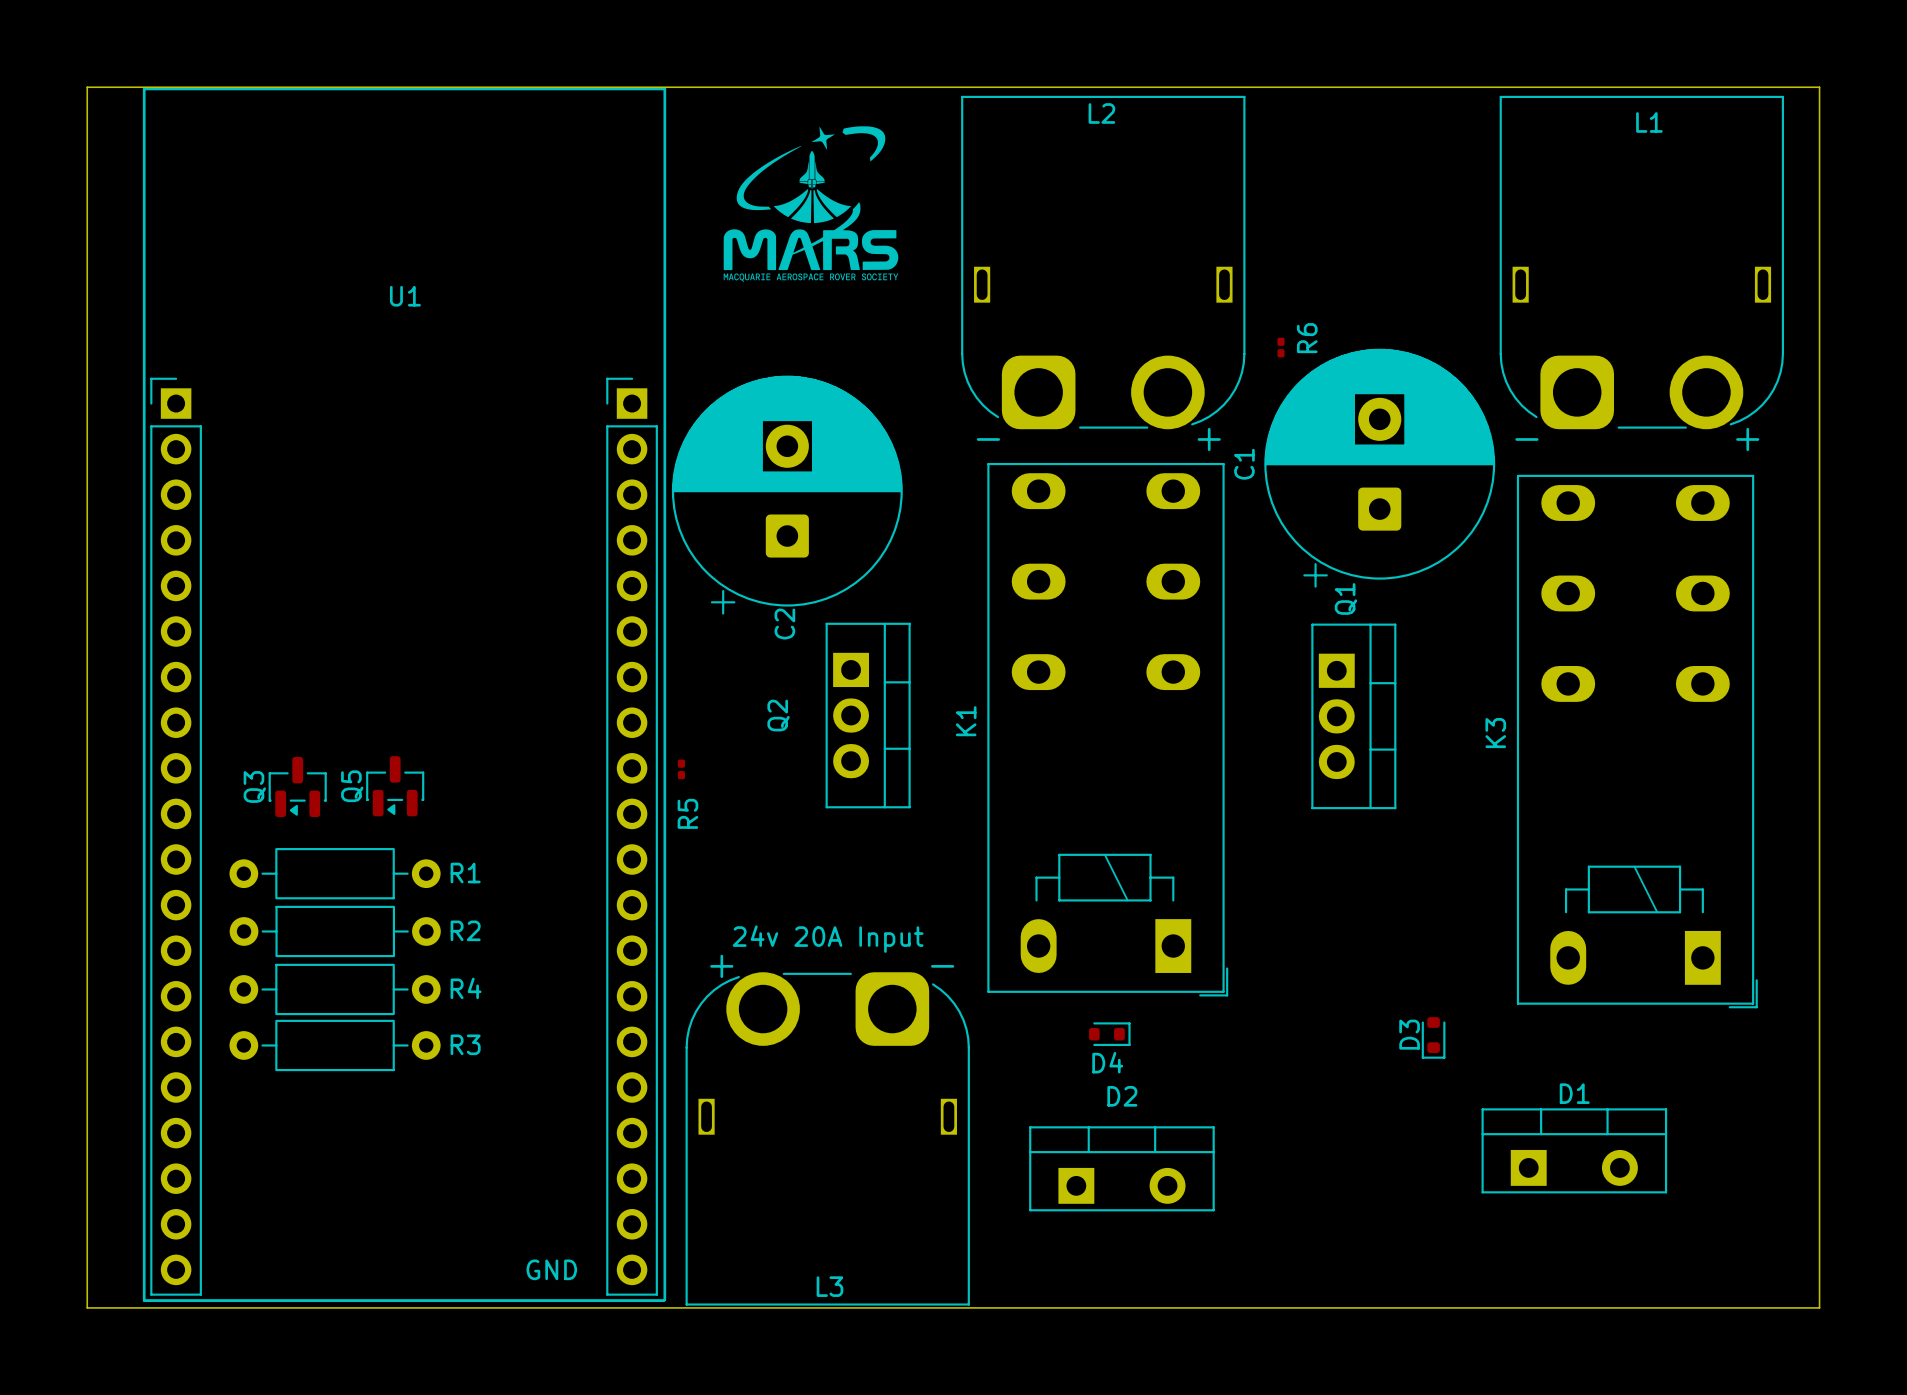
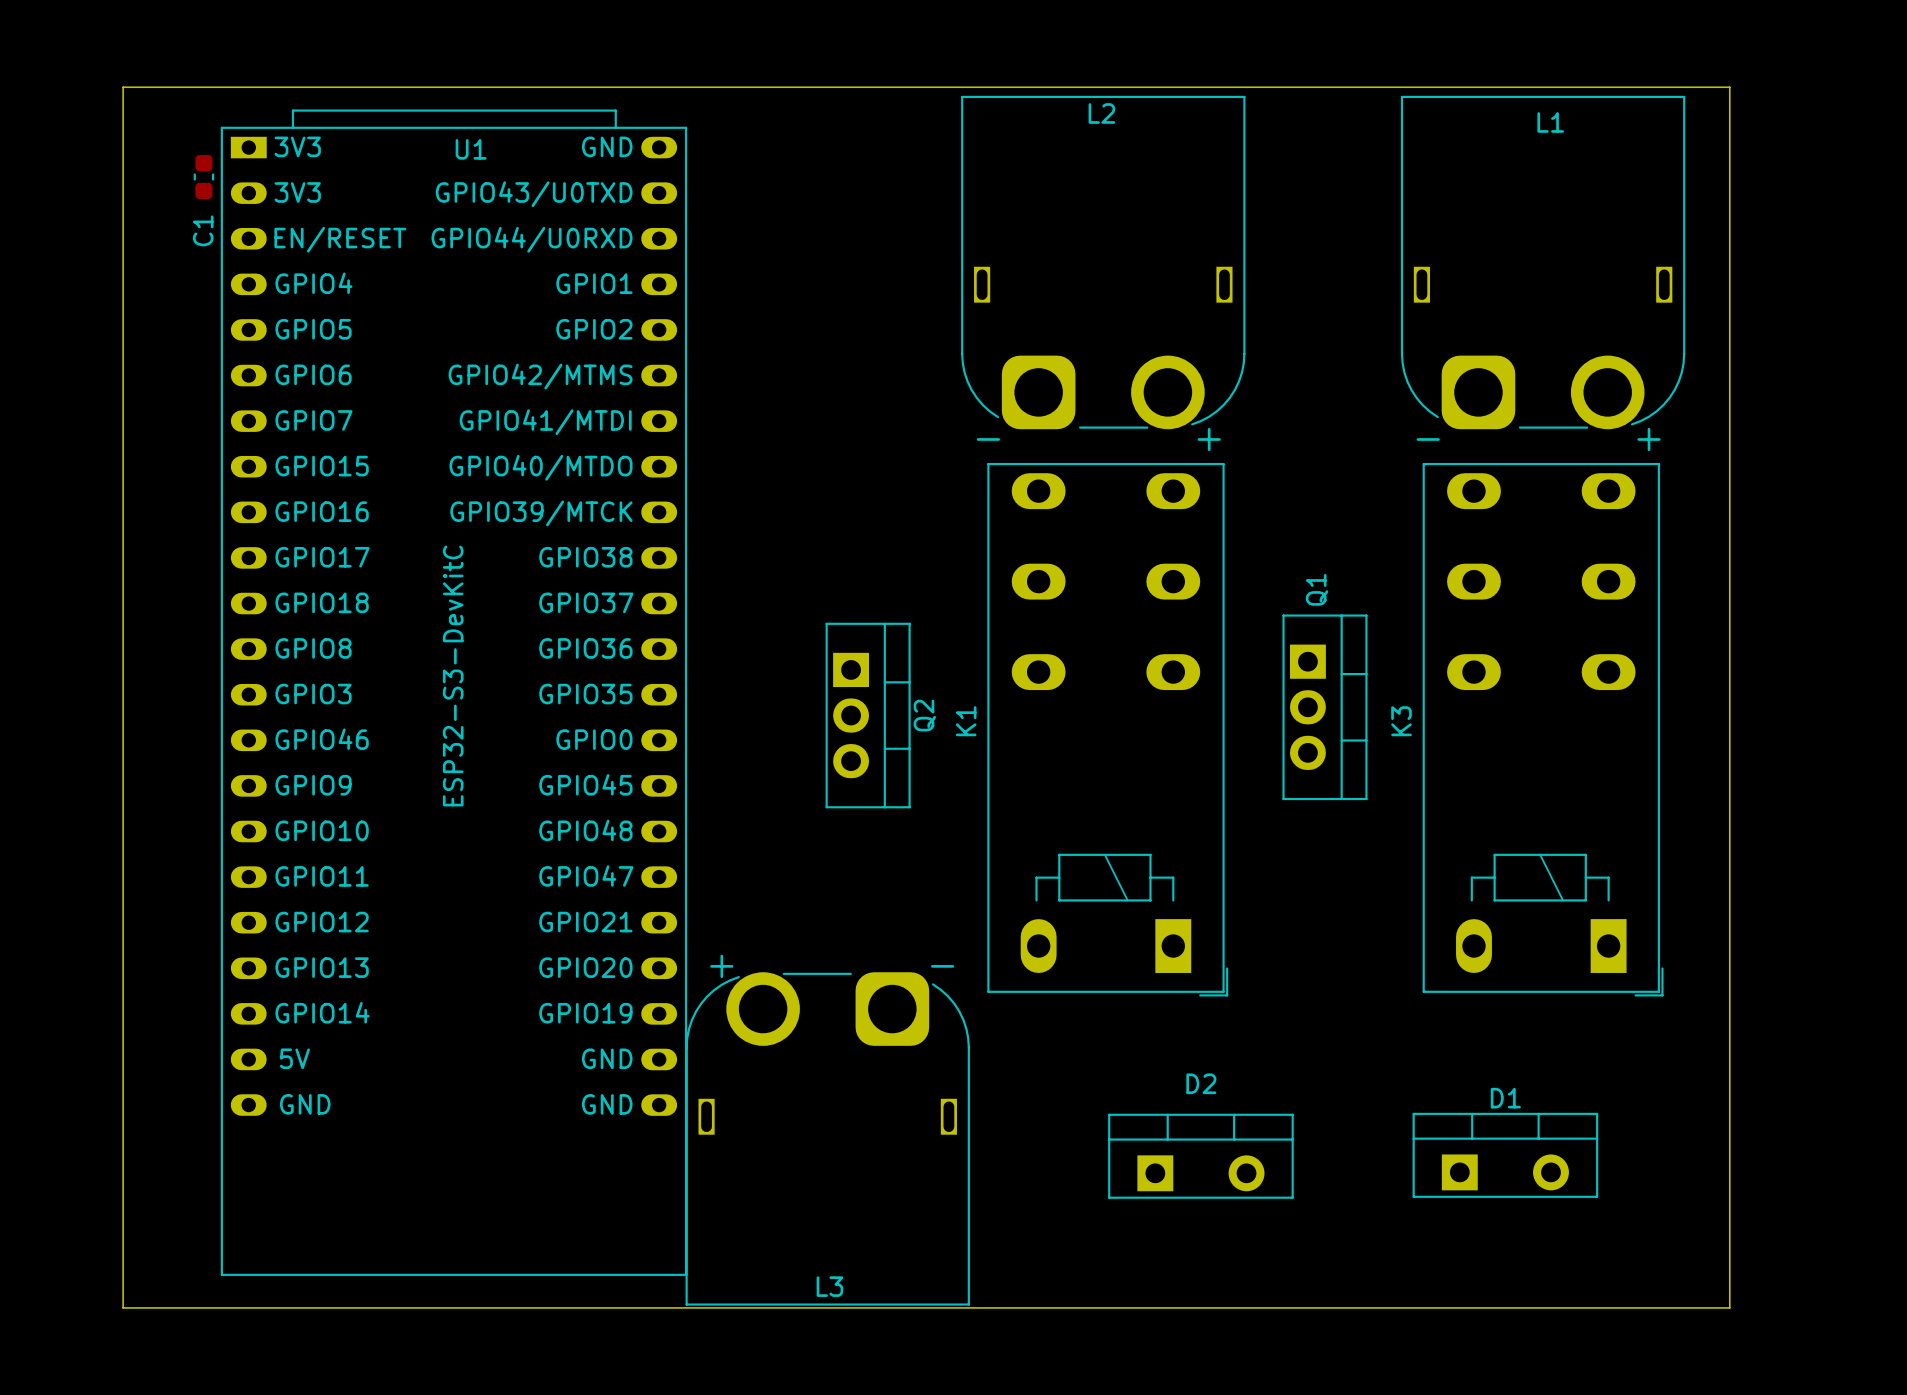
board edge: (123, 87) (87, 87) (87, 1307) (123, 1307) -> (123, 87) (123, 1307)
U1 footprint: [142, 87, 667, 1303] -> [220, 109, 688, 1276]
board edge: (1729, 87) (1819, 87) (1819, 1307) (1729, 1307) -> (1729, 87) (1729, 1307)
drawing: [723, 126, 899, 282] -> none
L1 position: (1641, 262) -> (1543, 262)
U1 name position: U1 (405, 296) -> U1 (471, 149)
R6: (1281, 347) -> none
C1 footprint: [1264, 348, 1496, 588] -> [193, 155, 215, 199]
C1 name position: C1 (1244, 464) -> C1 (203, 230)
C2: (787, 495) -> none
U1 value: none -> ESP32-S3-DevKitC (453, 676)
Q2 name position: Q2 (778, 715) -> Q2 (924, 715)
Q1 position: (1353, 716) -> (1324, 707)
K3 position: (1637, 741) -> (1543, 729)
R5: (681, 769) -> none
Q3: (297, 786) -> none
Q5: (395, 786) -> none
R1: (335, 873) -> none
R2: (335, 931) -> none
L3 value: 24v 20A Input (828, 939) -> none
R4: (335, 989) -> none
D4: (1109, 1034) -> none
D3: (1433, 1037) -> none
R3: (335, 1045) -> none
D1 position: (1574, 1150) -> (1505, 1155)
D2 position: (1121, 1168) -> (1200, 1156)
text: GND (551, 1269) -> none

